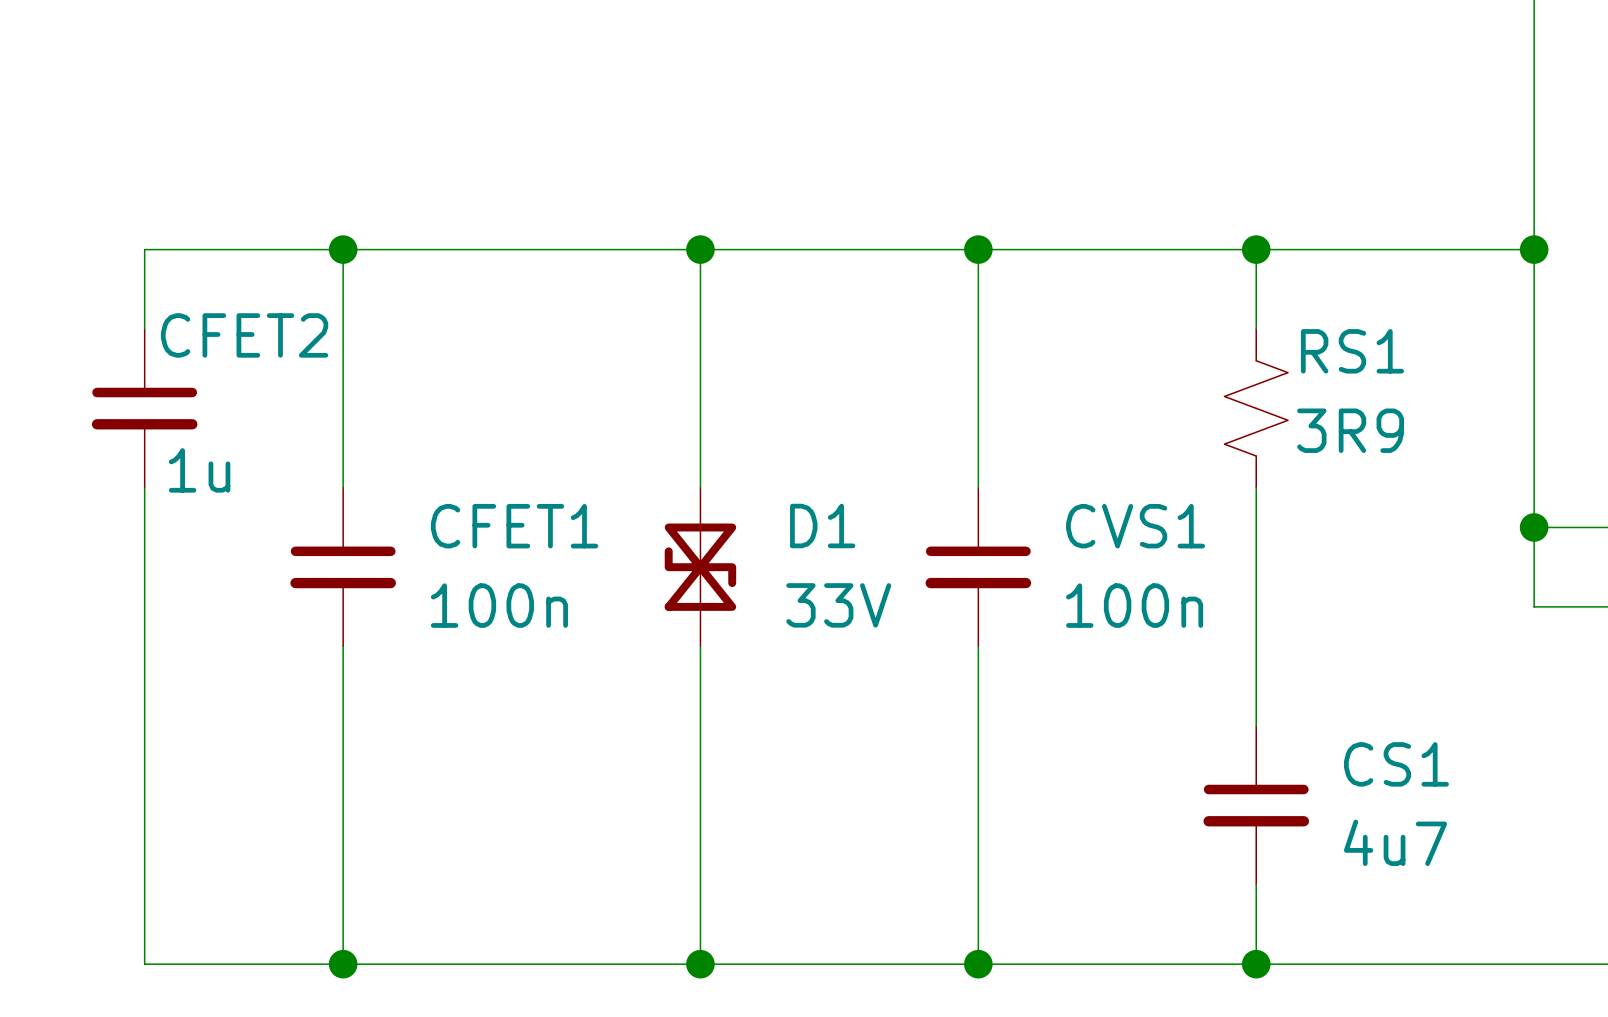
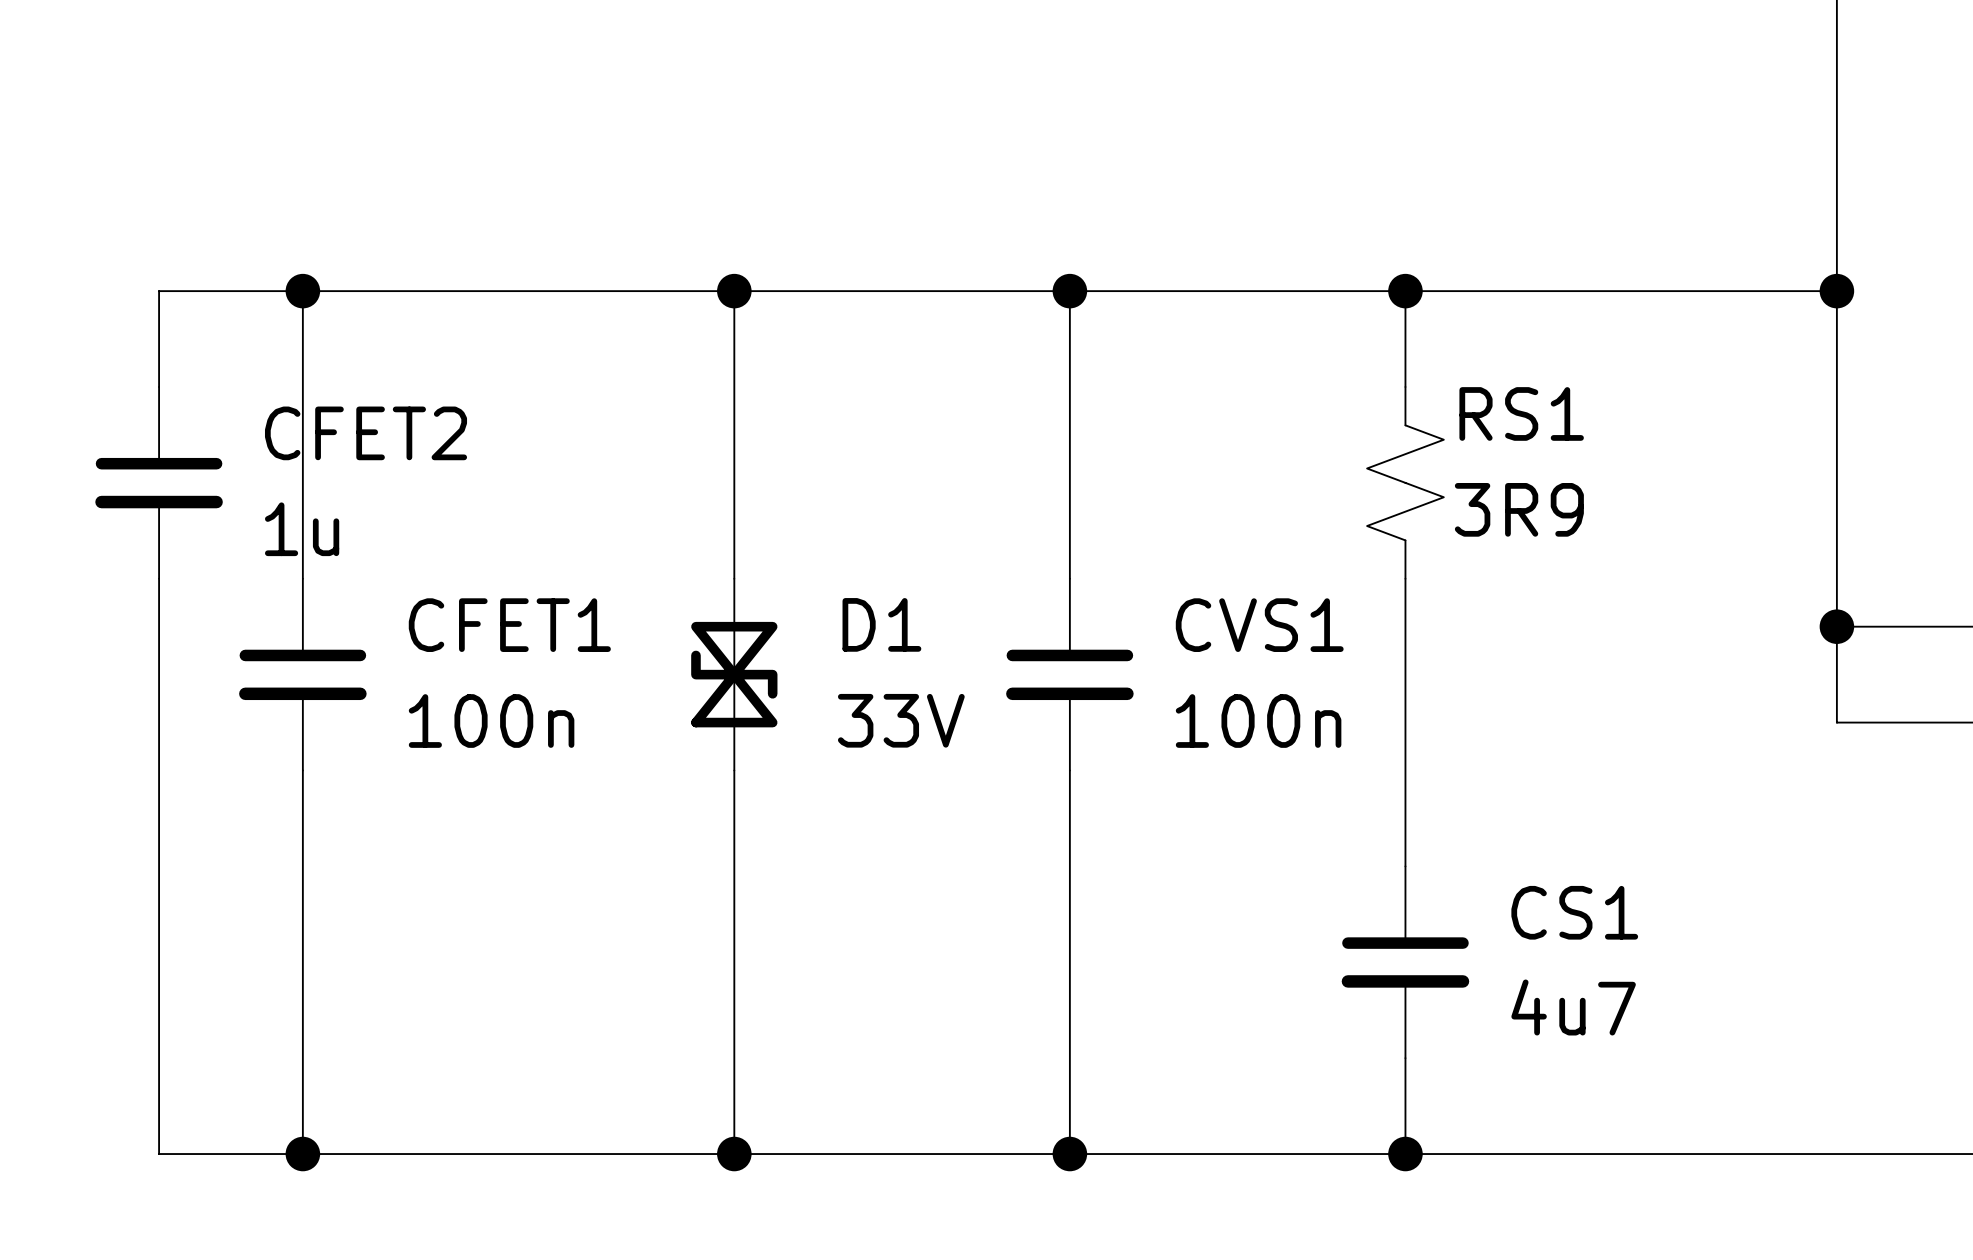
wire: (343, 249) (343, 487) -> (302, 291) (302, 578)
junction position: (343, 249) -> (302, 291)
wire: (700, 249) (700, 487) -> (734, 291) (734, 578)
junction position: (700, 249) -> (734, 291)
wire: (978, 249) (978, 487) -> (1069, 291) (1069, 578)
junction position: (978, 249) -> (1069, 291)
wire: (1256, 249) (1256, 328) -> (1405, 291) (1405, 387)
junction position: (1256, 249) -> (1405, 291)
CFET2 name position: CFET2 (244, 335) -> CFET2 (366, 433)
RS1 position: (1256, 408) -> (1405, 482)
CFET2 value position: 1u (199, 470) -> 1u (302, 529)
wire: (1256, 487) (1256, 725) -> (1405, 578) (1405, 866)
CFET1 position: (343, 567) -> (302, 674)
D1 position: (700, 567) -> (734, 674)
CVS1 position: (978, 567) -> (1069, 674)
wire: (343, 646) (343, 964) -> (302, 770) (302, 1154)
wire: (700, 646) (700, 964) -> (734, 770) (734, 1154)
wire: (978, 646) (978, 964) -> (1069, 770) (1069, 1154)
CS1 position: (1256, 805) -> (1405, 962)
wire: (1256, 884) (1256, 964) -> (1405, 1058) (1405, 1154)
junction position: (343, 964) -> (302, 1154)
junction position: (700, 964) -> (734, 1154)
junction position: (978, 964) -> (1069, 1154)
junction position: (1256, 964) -> (1405, 1154)

